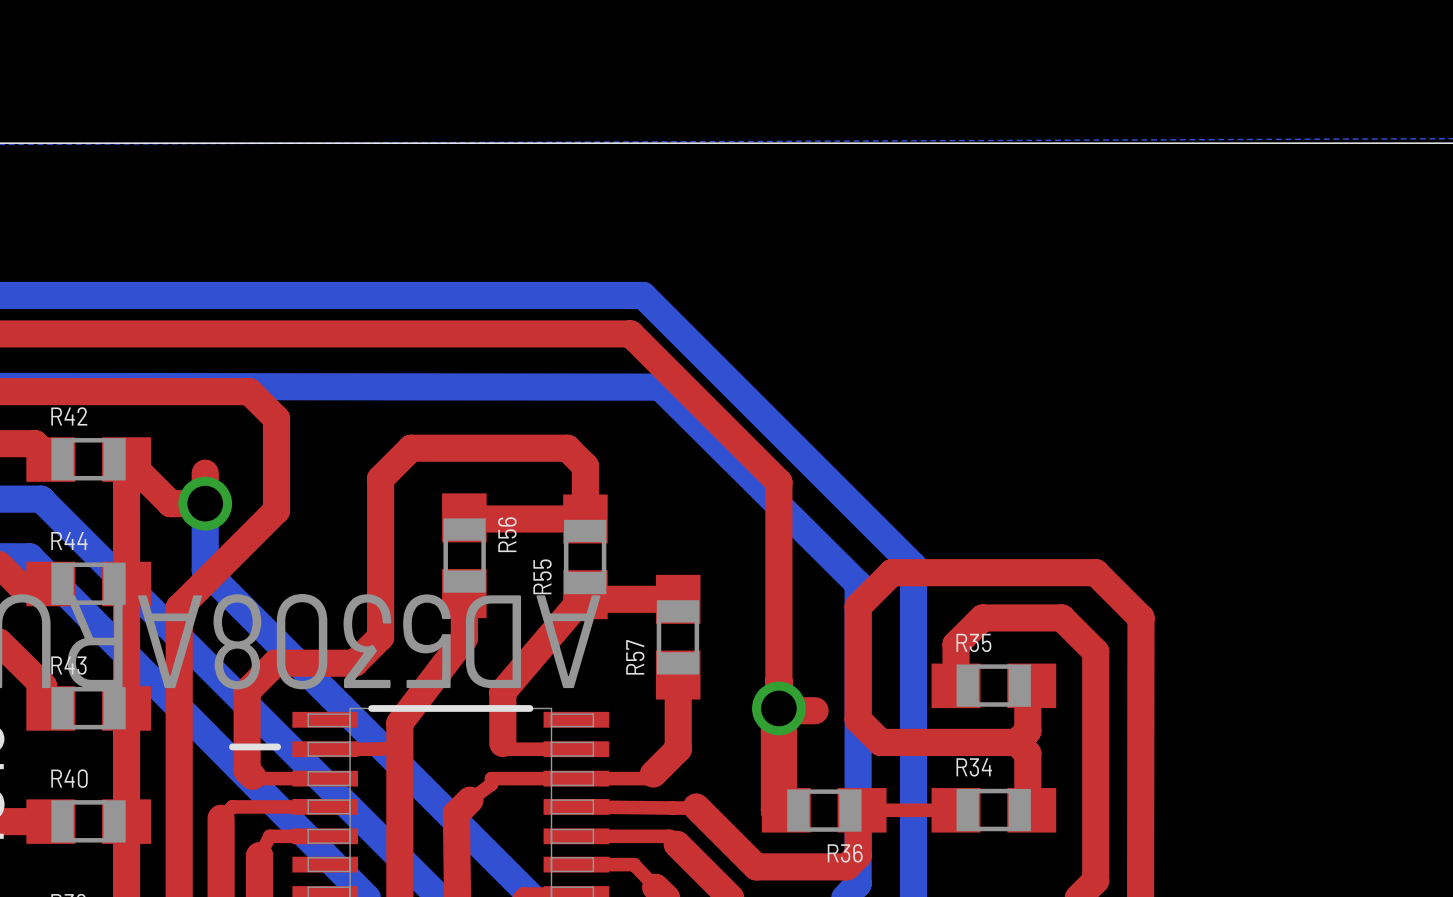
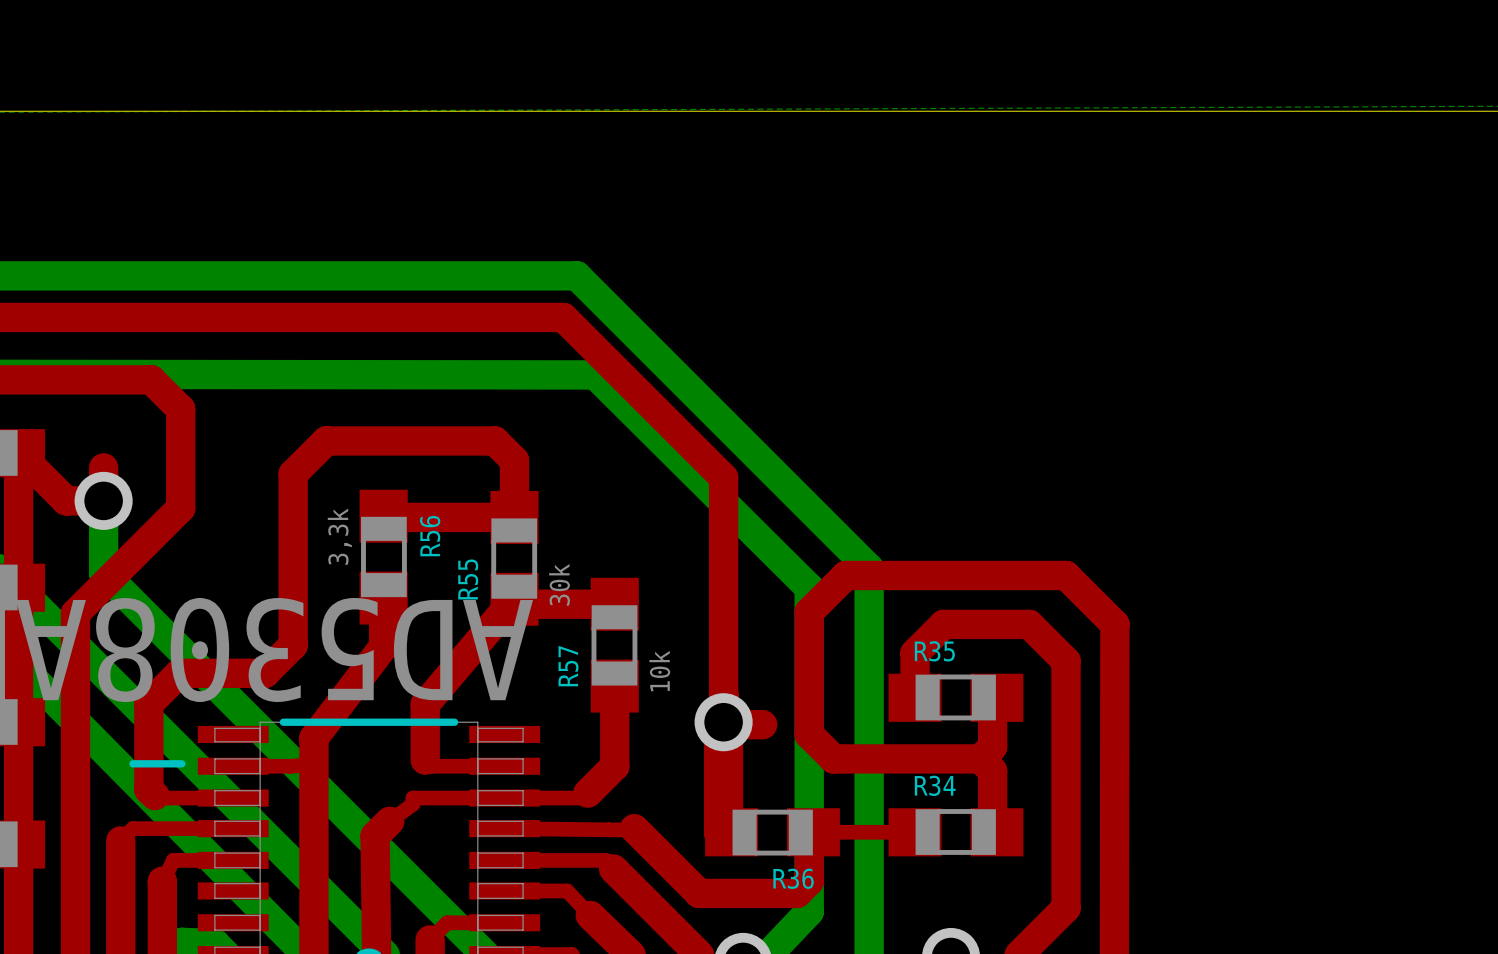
R56 value: none -> 3,3k (339, 536)
R55 value: none -> 30k (559, 584)
R57 value: none -> 10k (659, 671)

